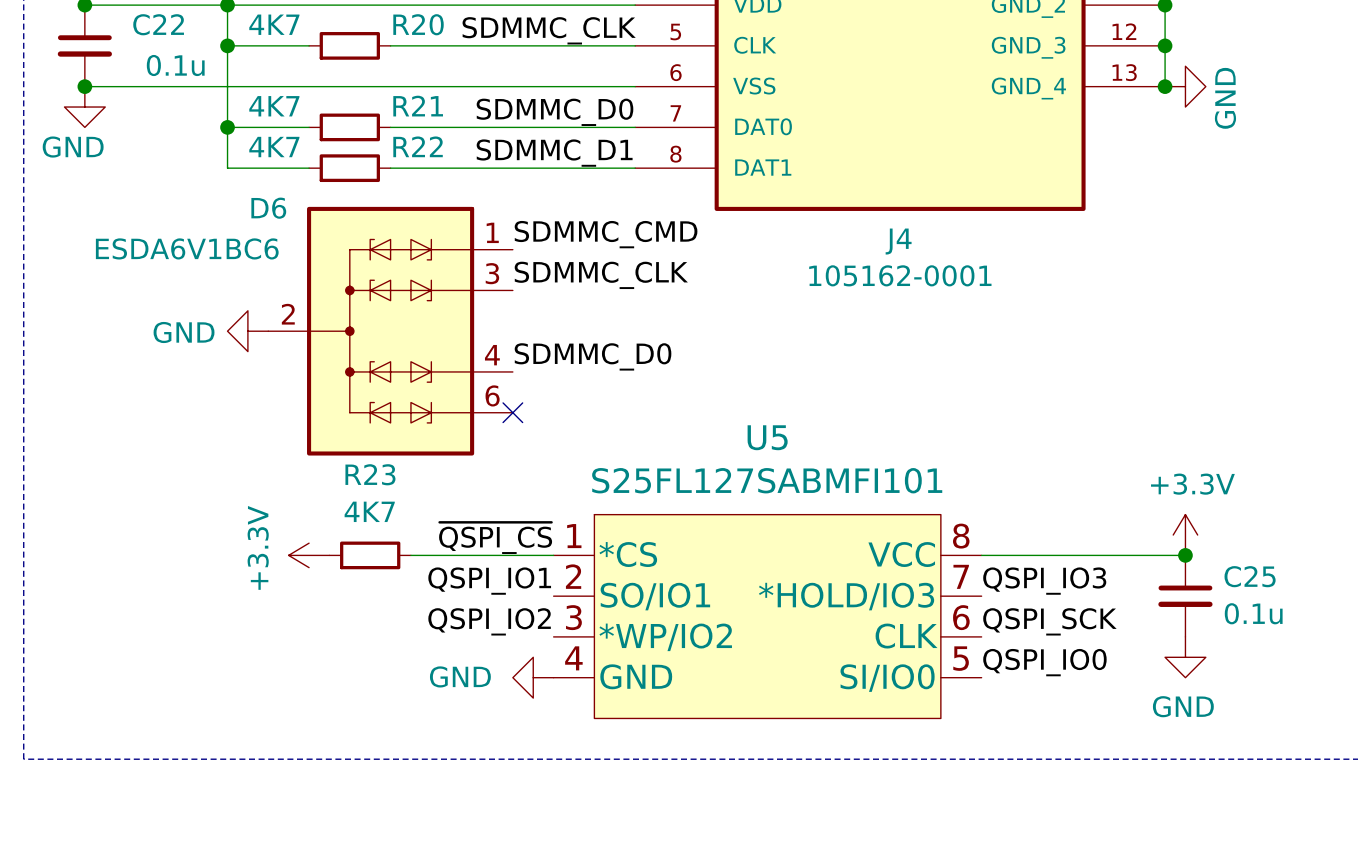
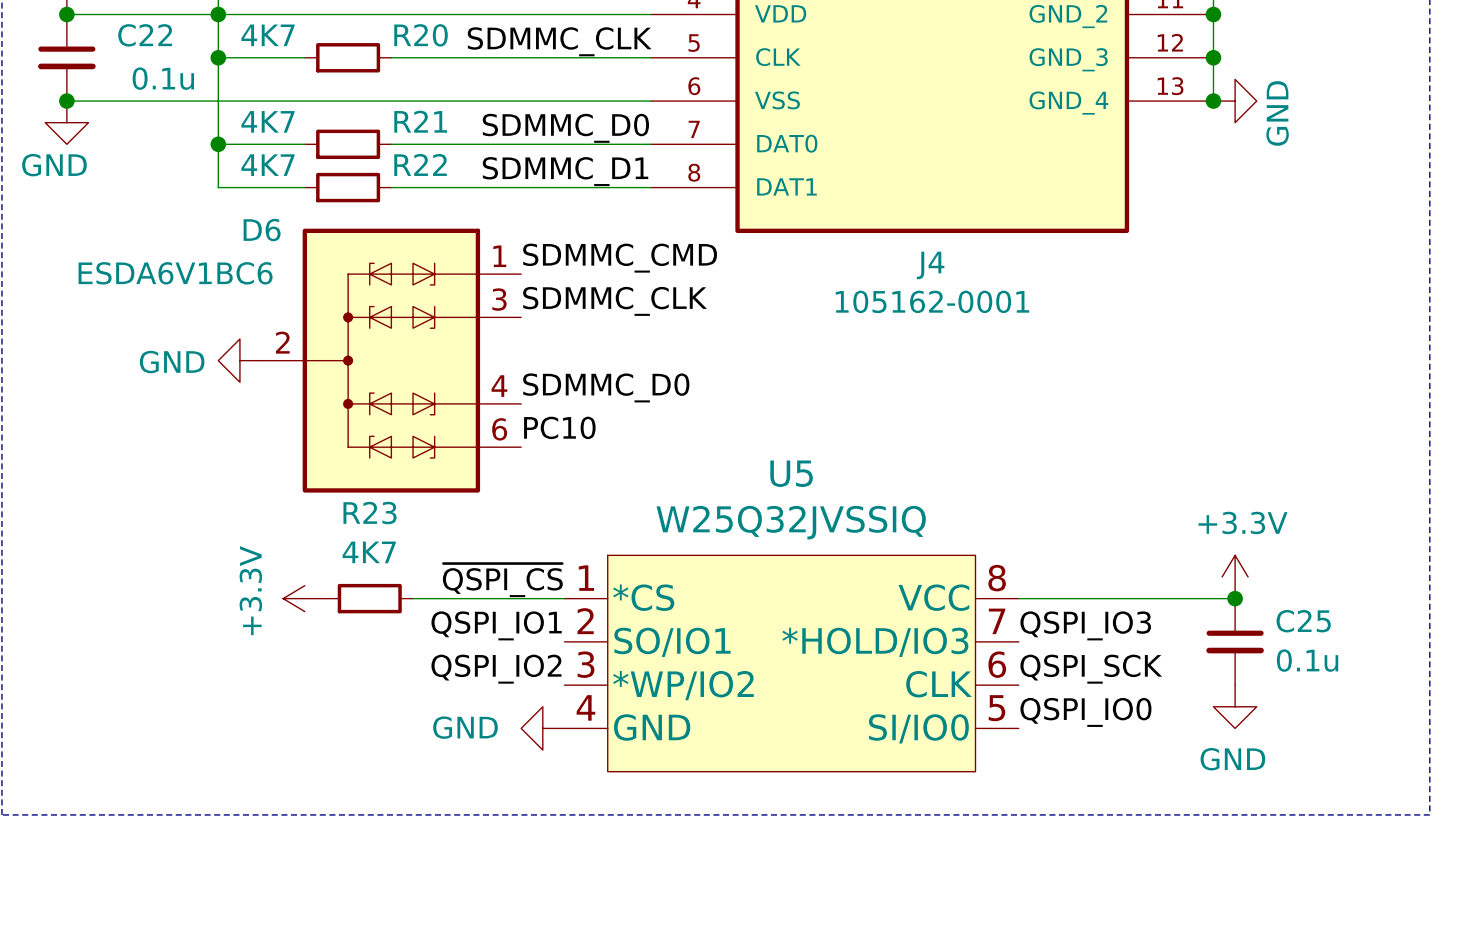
label: none -> PC10 (559, 427)
no-connect mark: (512, 412) -> none
U5 value: S25FL127SABMFI101 (767, 480) -> W25Q32JVSSIQ (791, 522)

